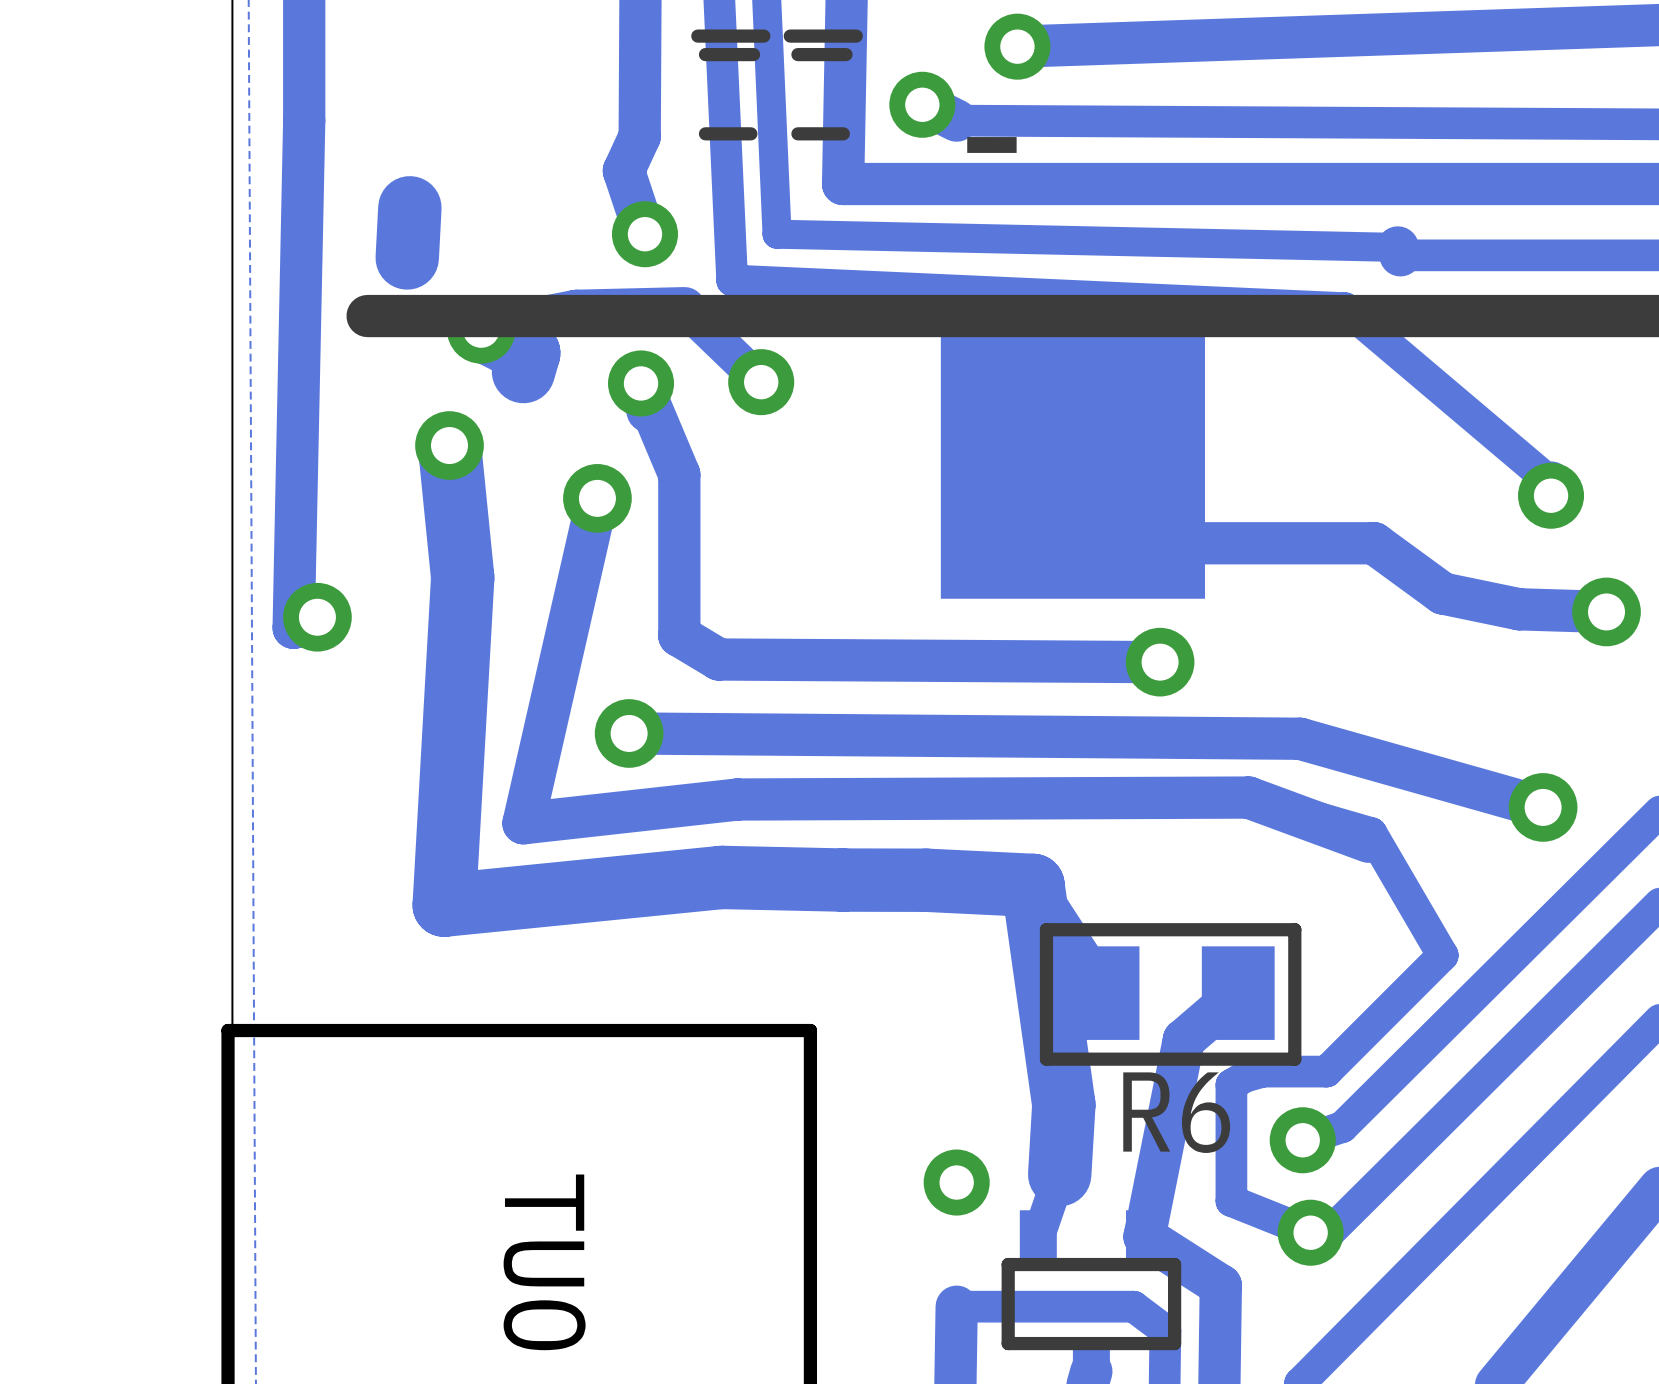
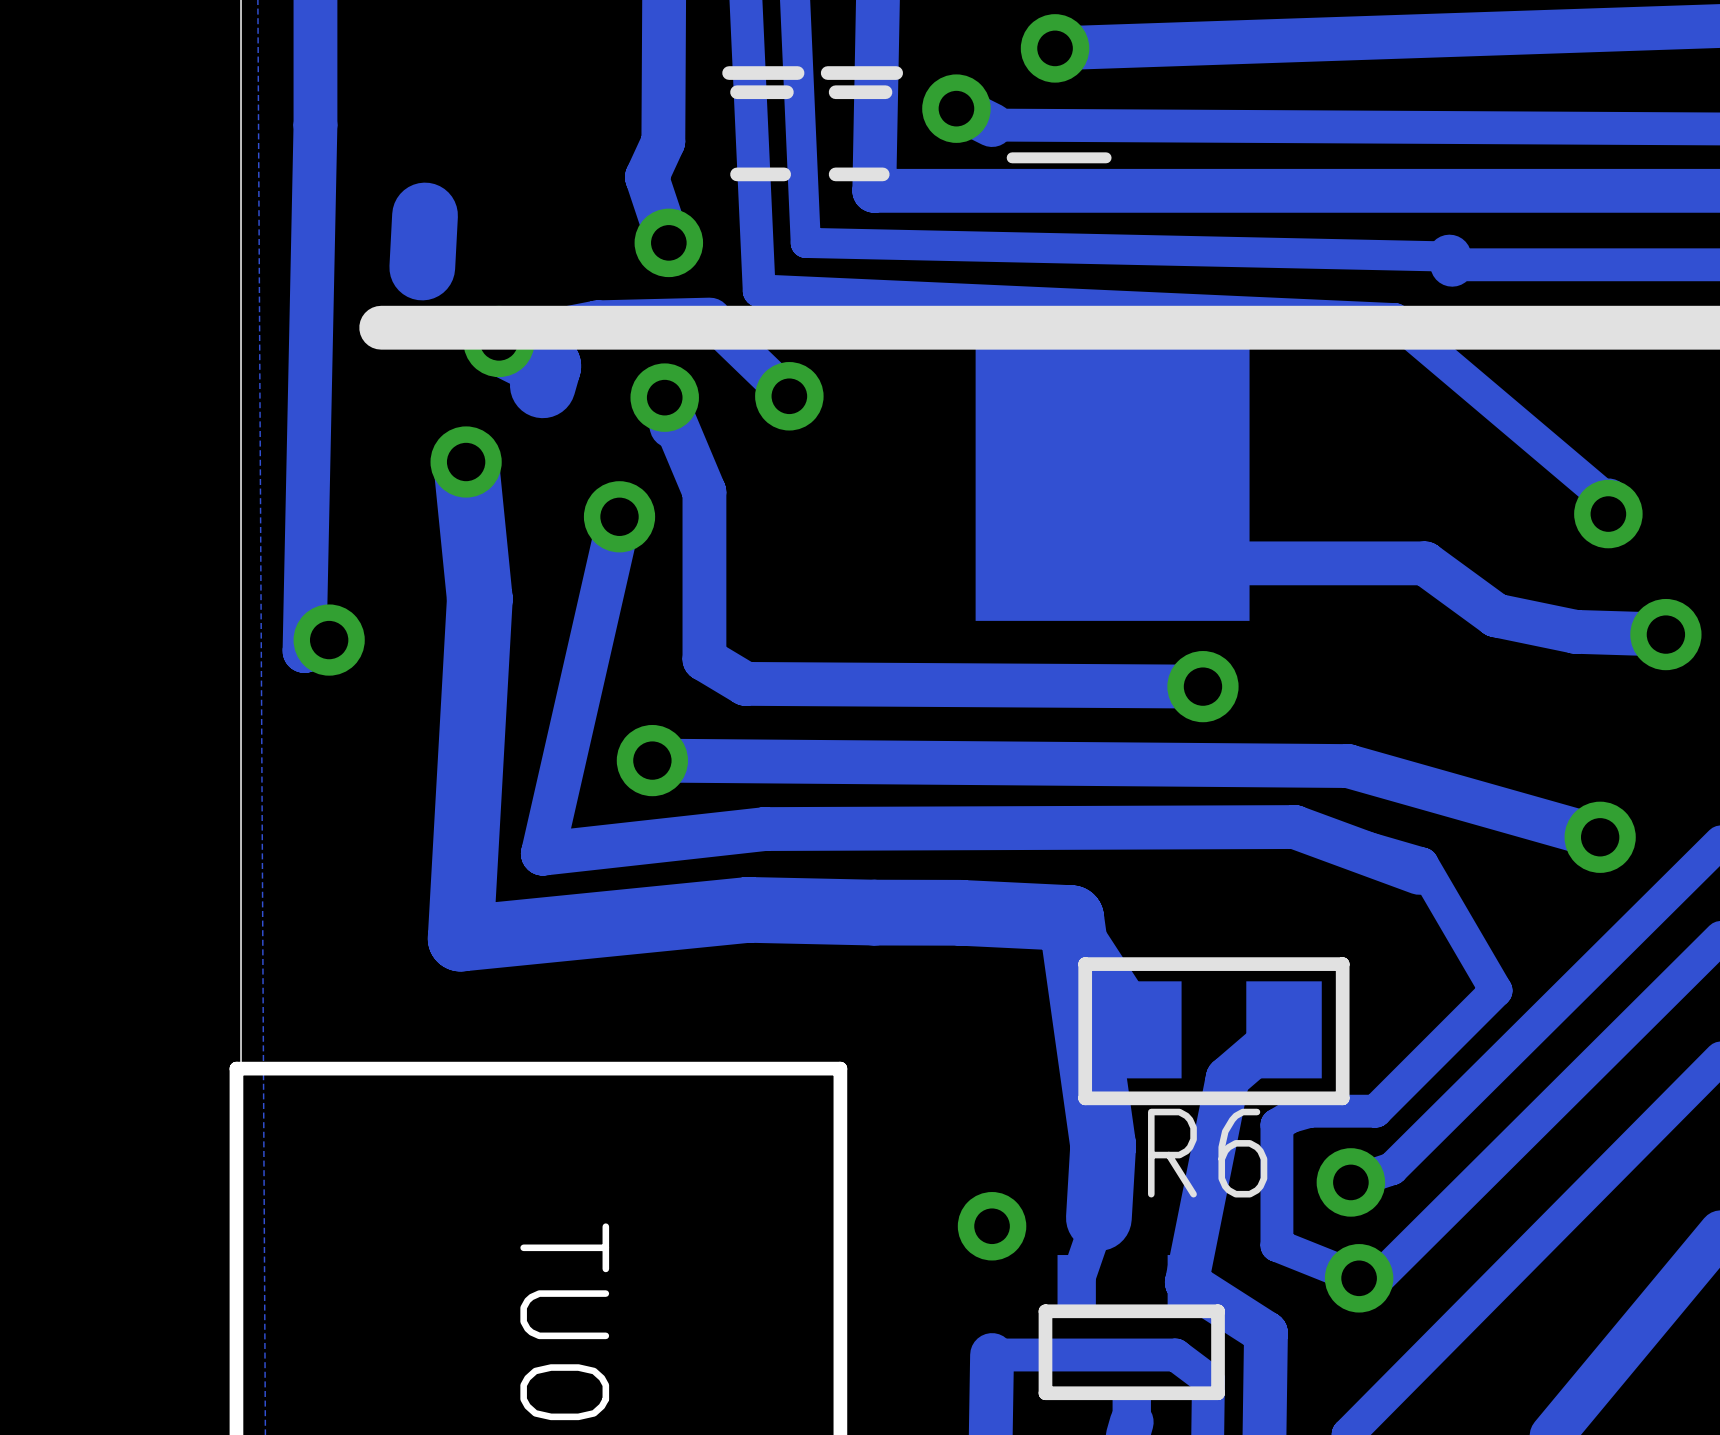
part position: (730, 84) -> (763, 123)
part position: (823, 84) -> (861, 123)

